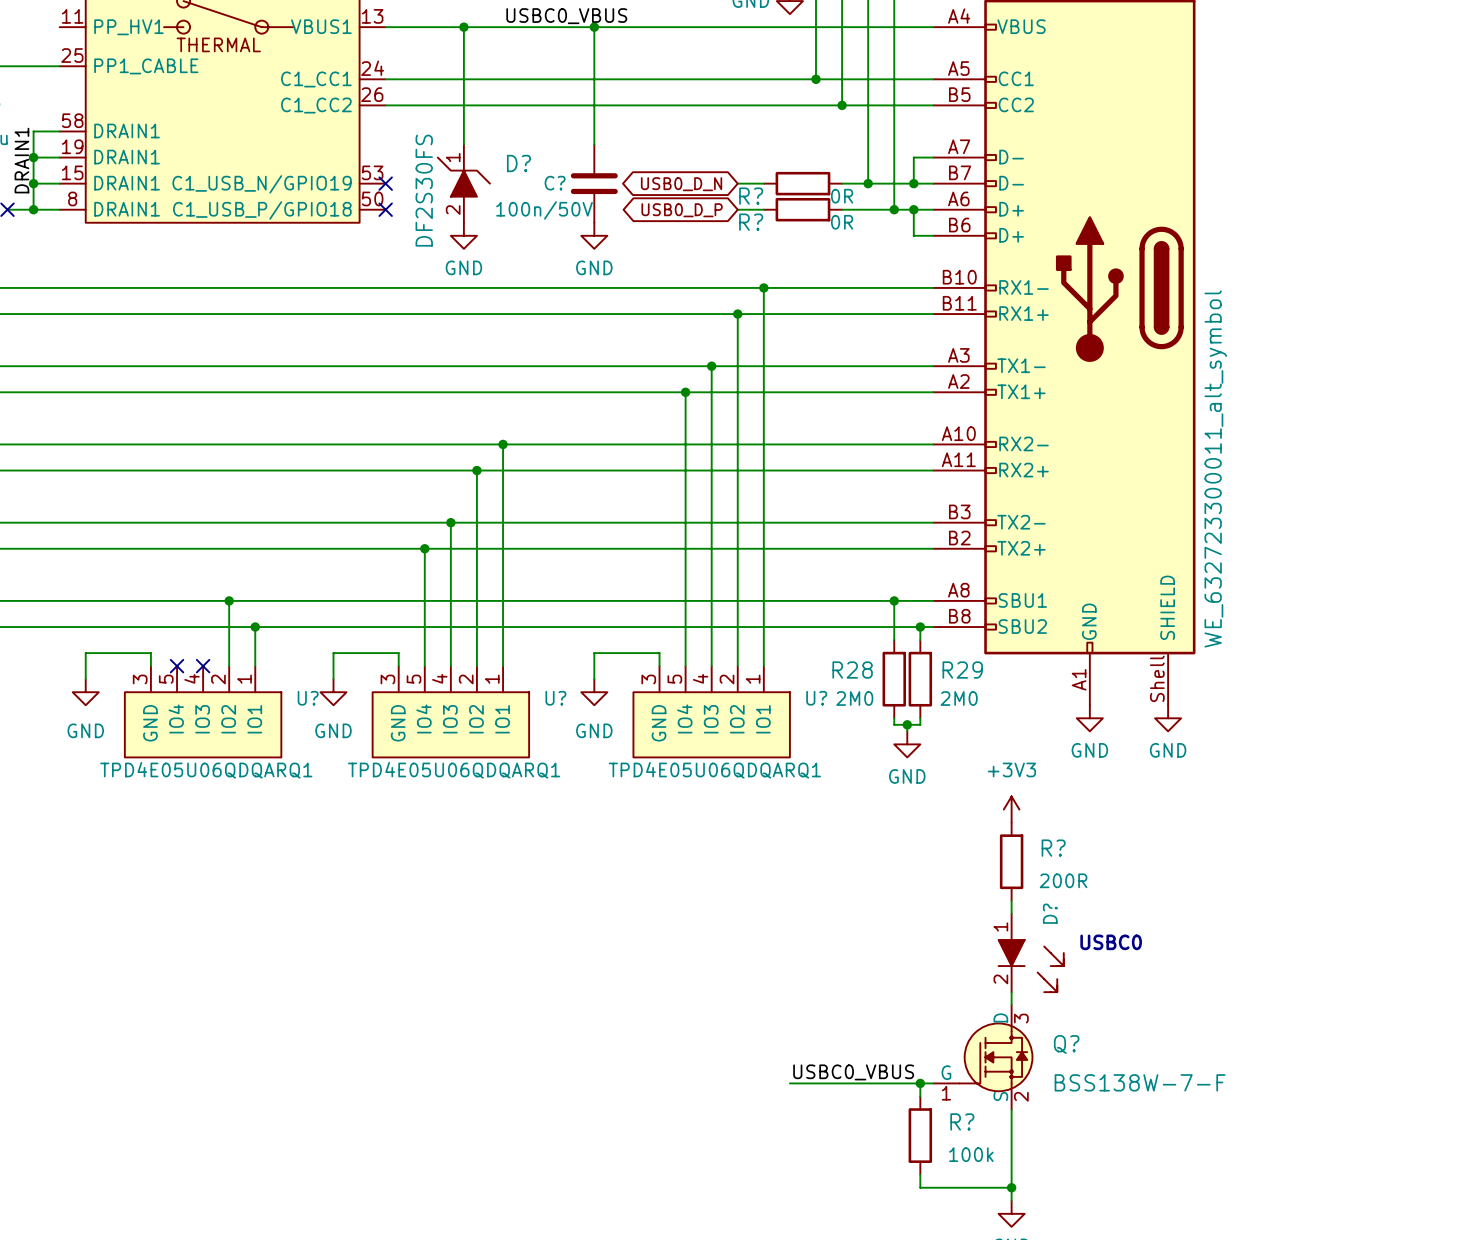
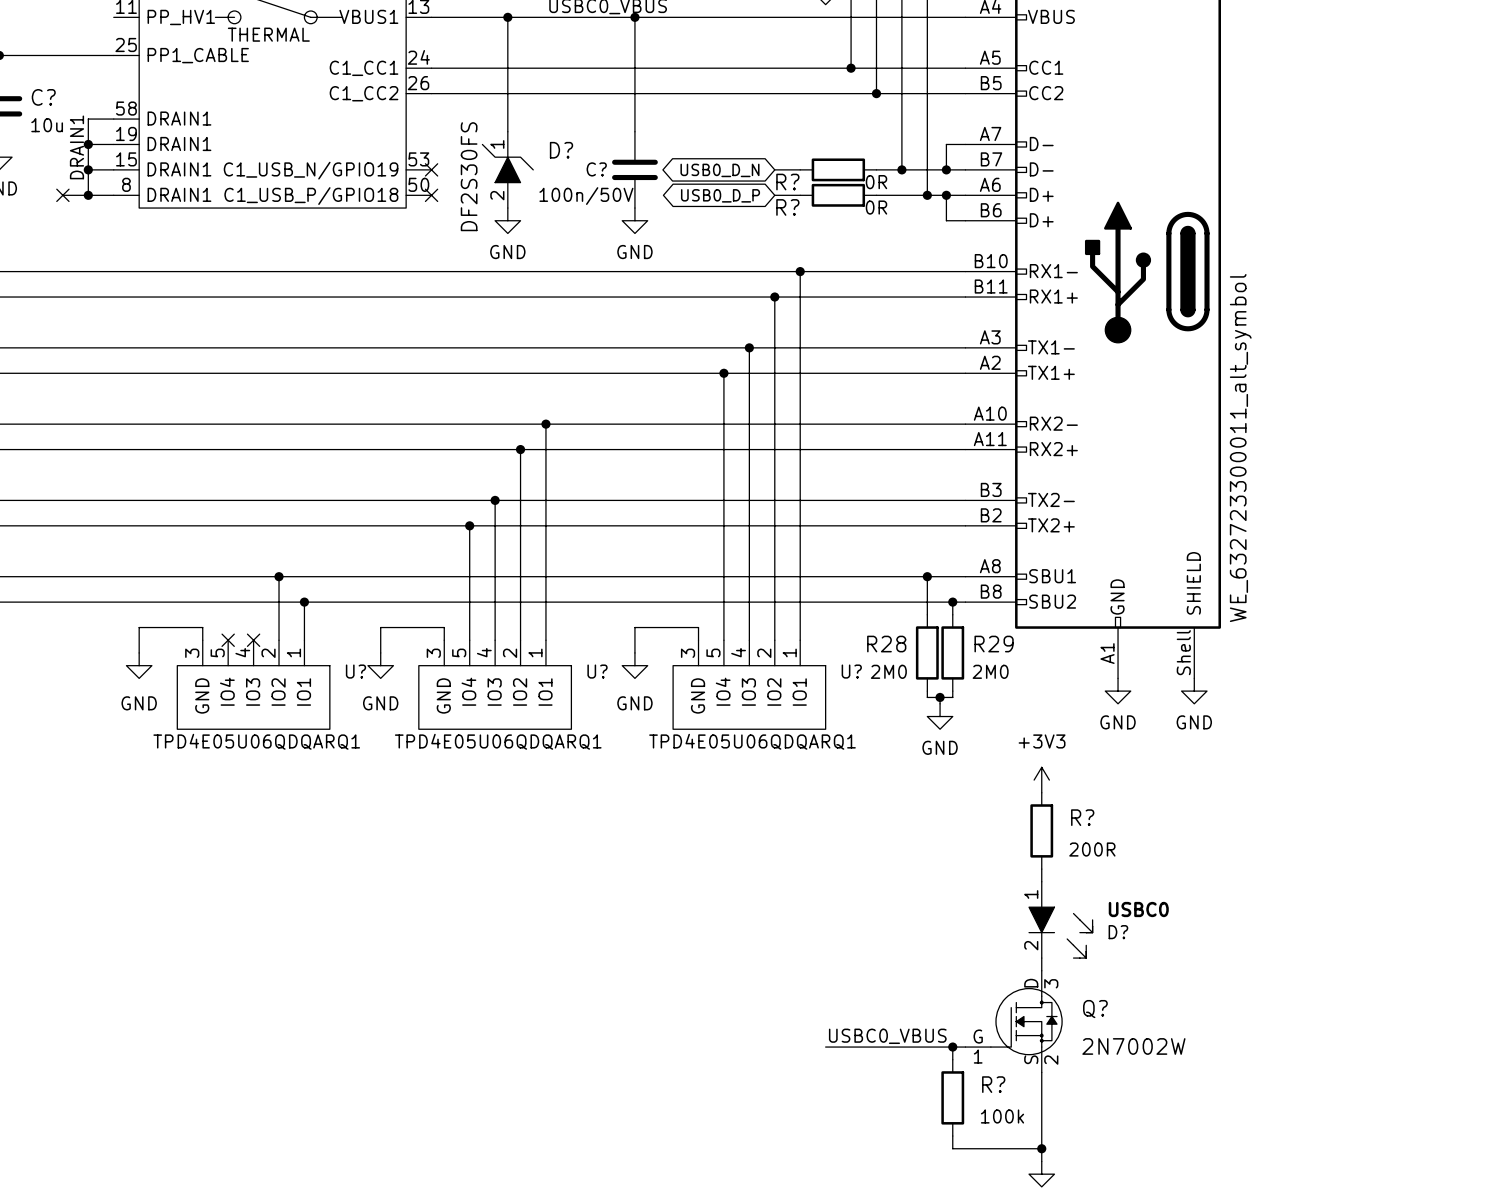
D? name rotation: 0° (1050, 913) -> 90° clockwise (1118, 932)
D? name position: D? (1050, 913) -> D? (1118, 932)
Q? value: BSS138W-7-F (1140, 1082) -> 2N7002W (1133, 1046)

